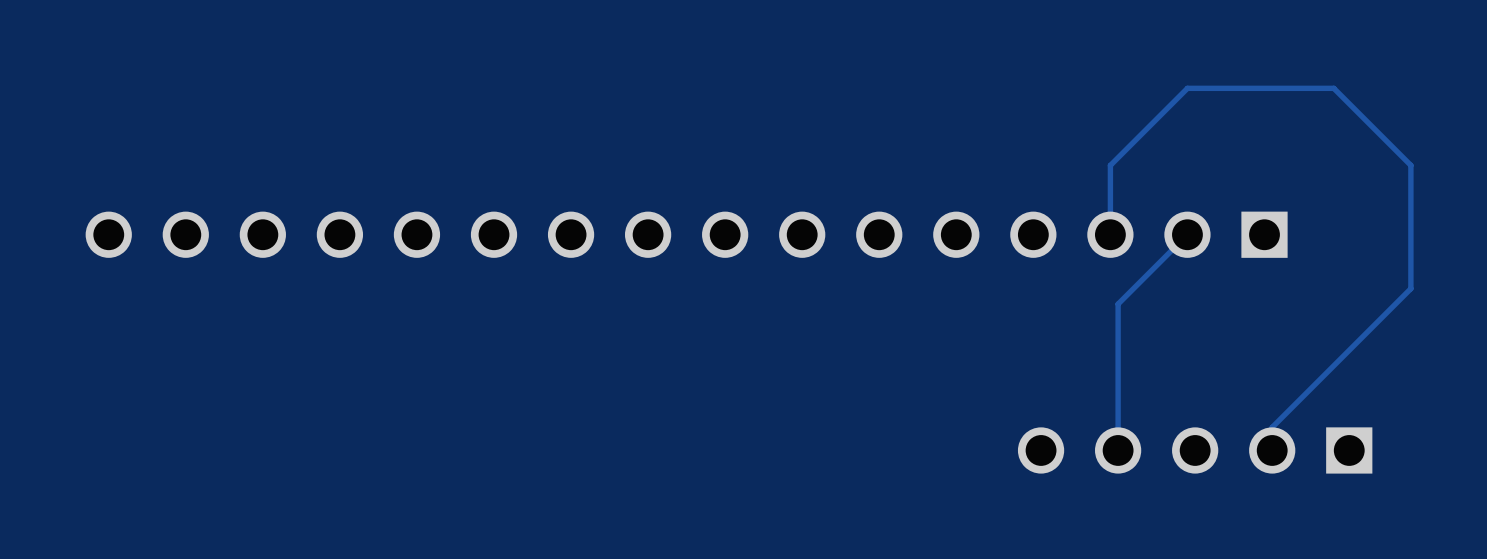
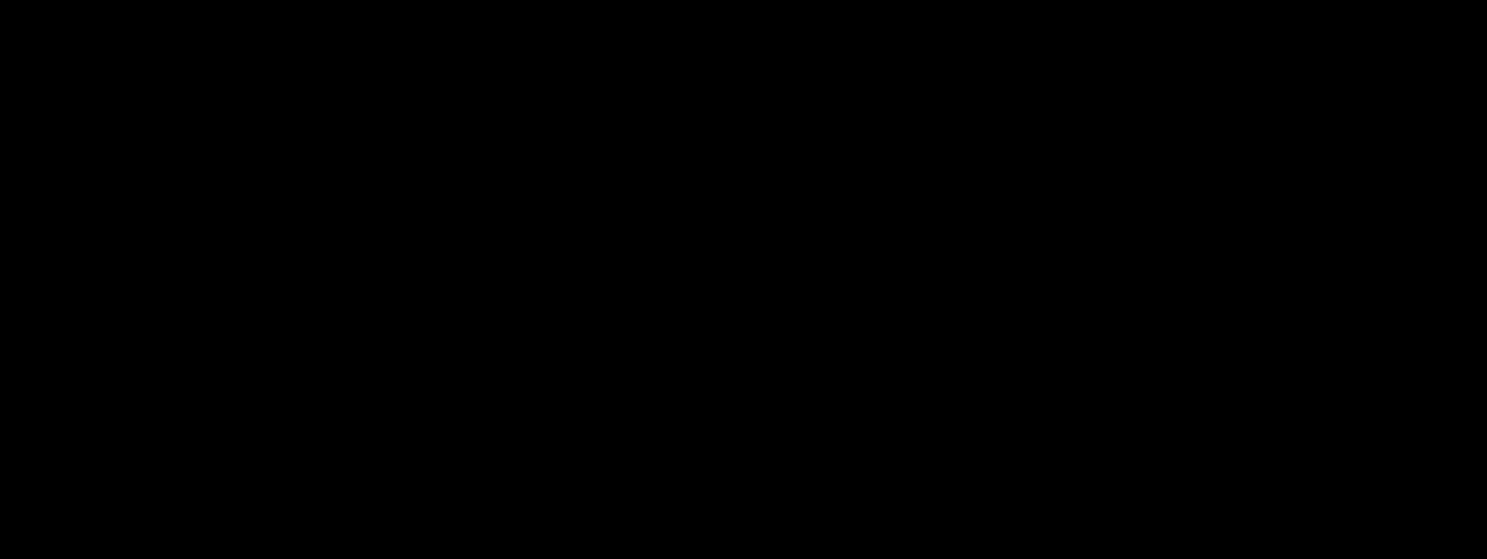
part: (686, 234) -> none
track: (1110, 234) (1110, 165) (1187, 88) (1333, 88) (1410, 165) (1410, 288) (1272, 427) (1272, 450) -> none
track: (1187, 234) (1118, 304) (1118, 450) -> none
part: (1195, 450) -> none

